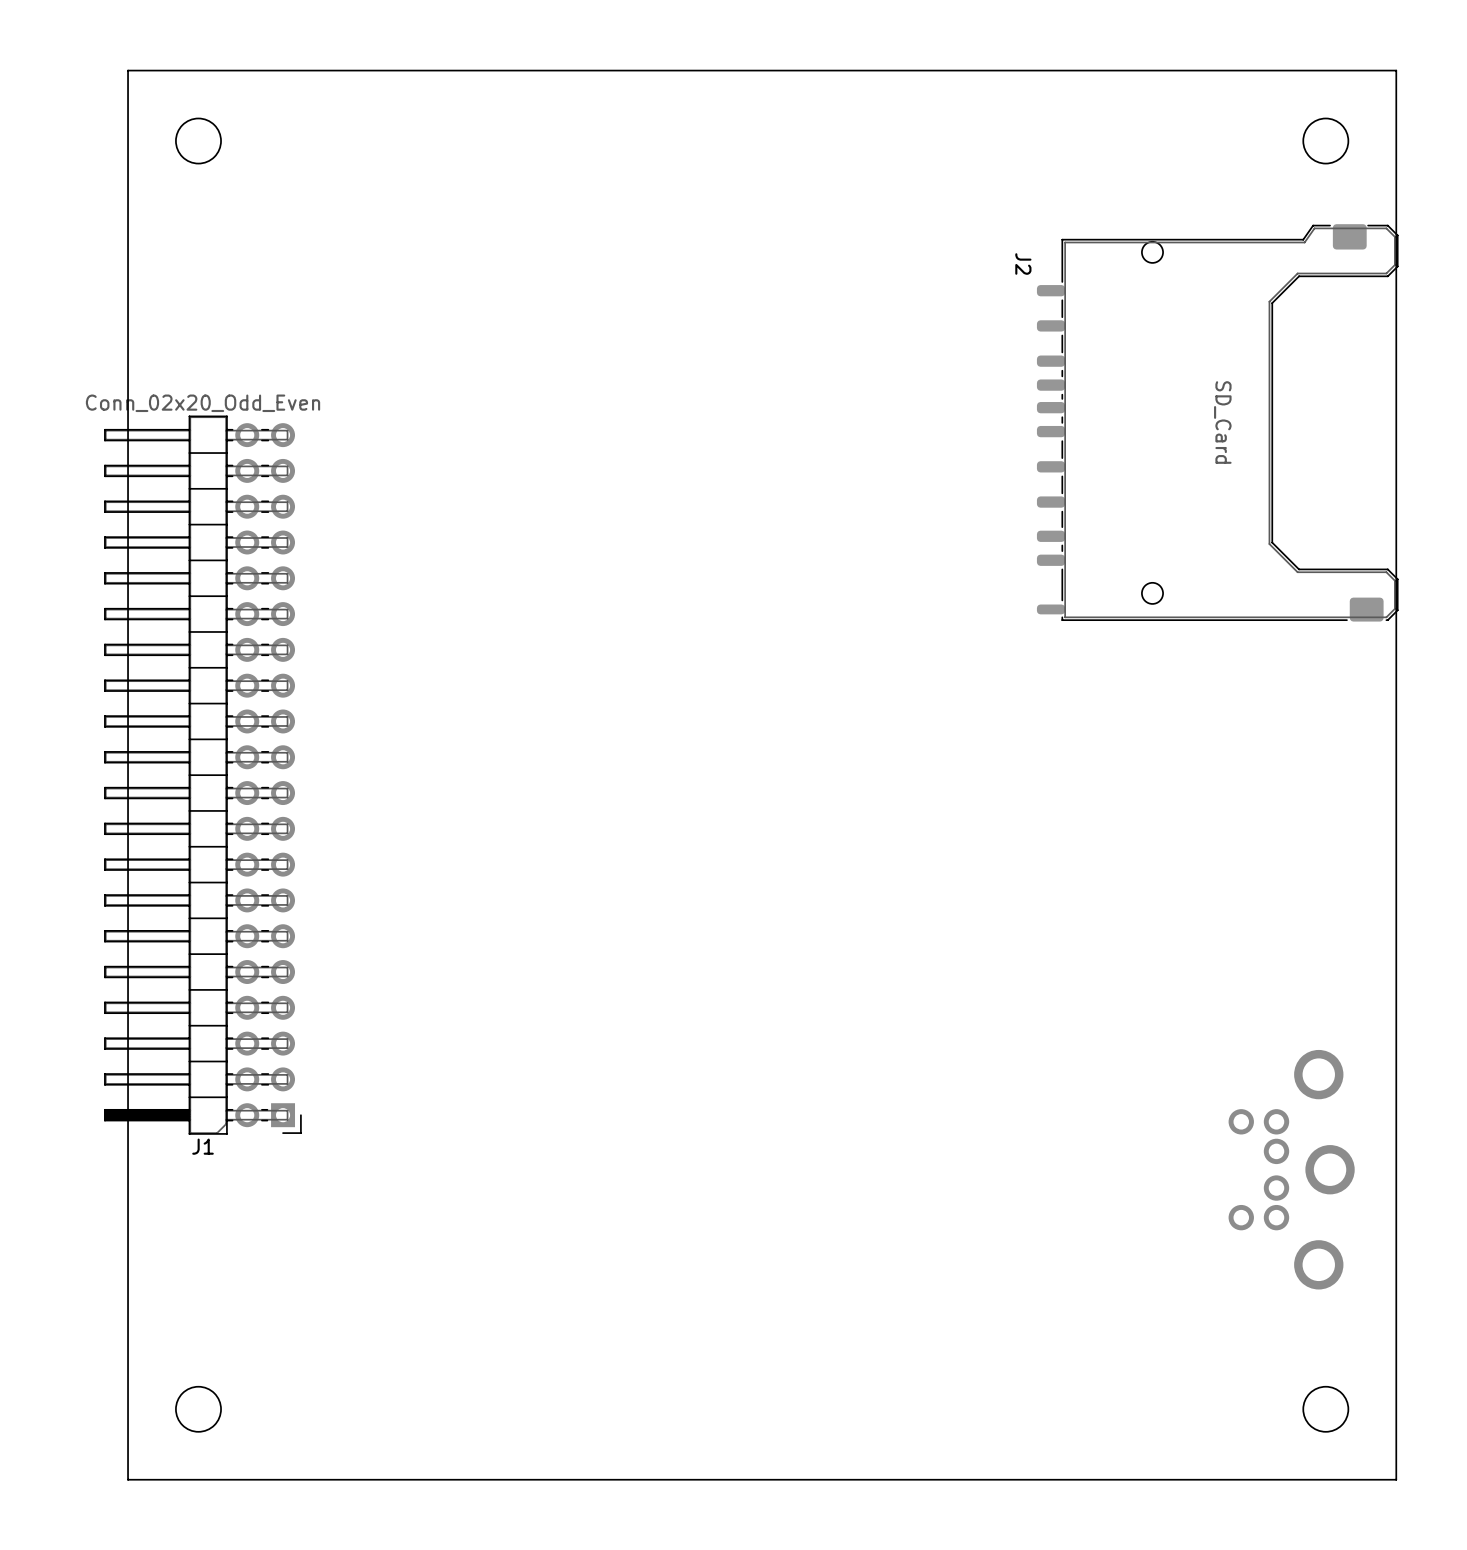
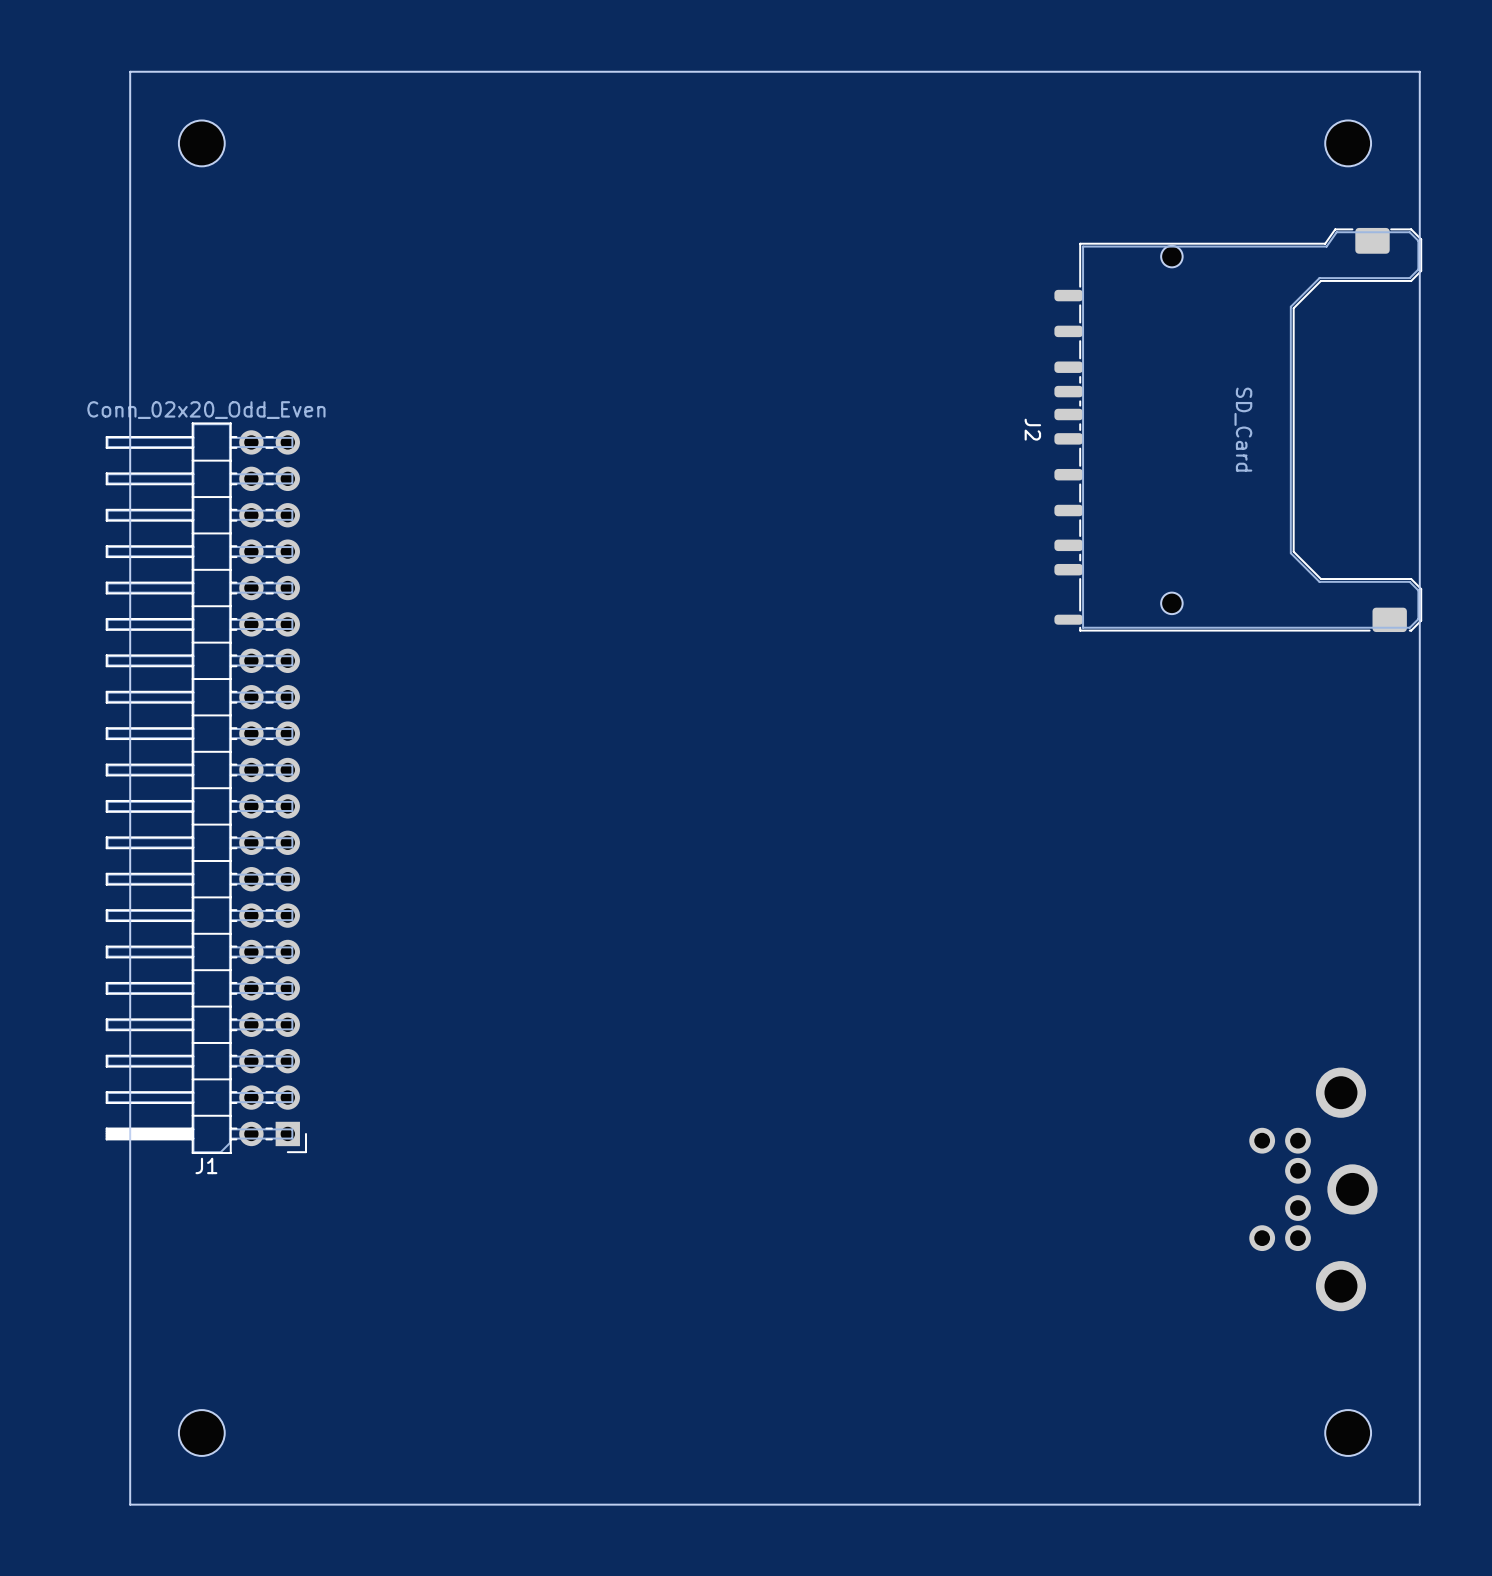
J2 name position: J2 (1023, 264) -> J2 (1032, 429)

